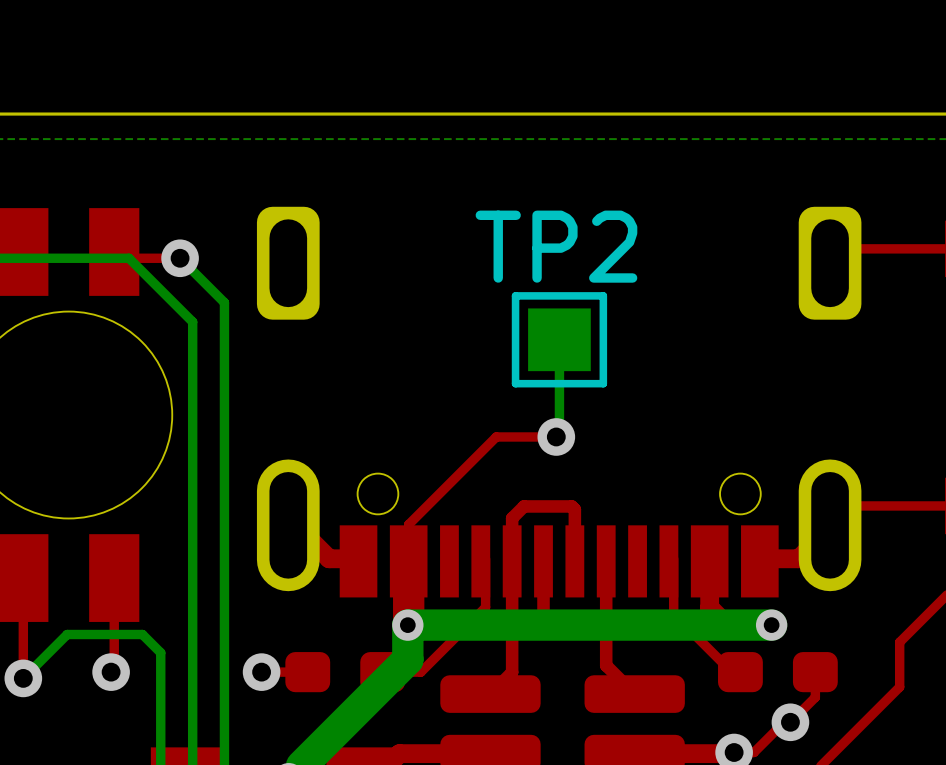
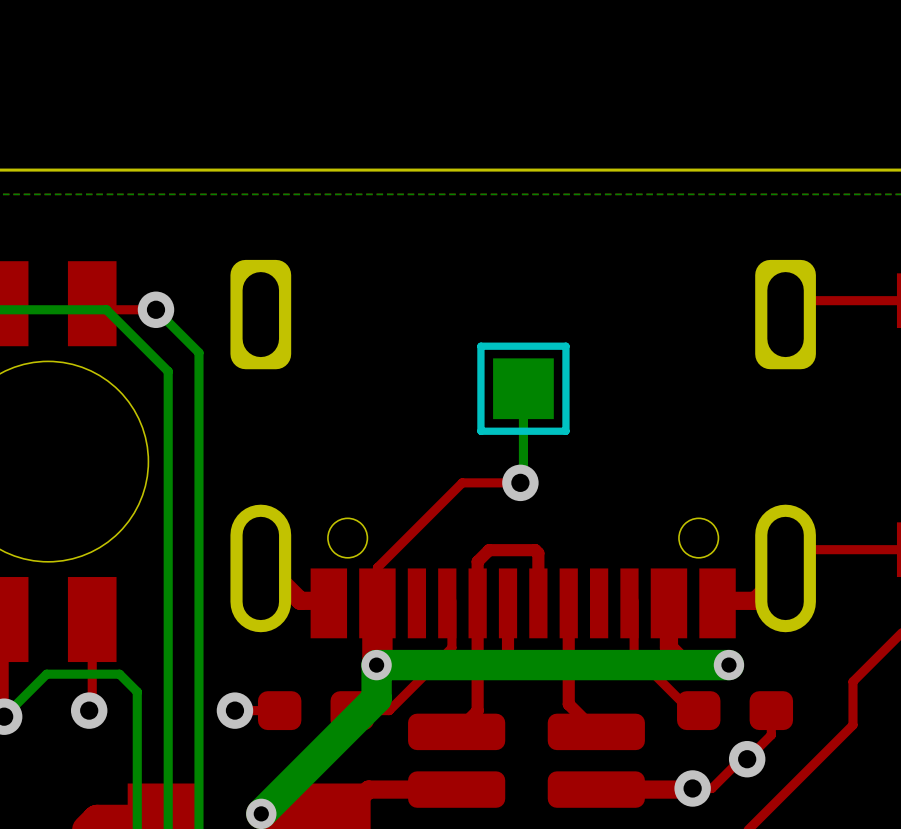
TP2 name: TP2 (556, 246) -> none

